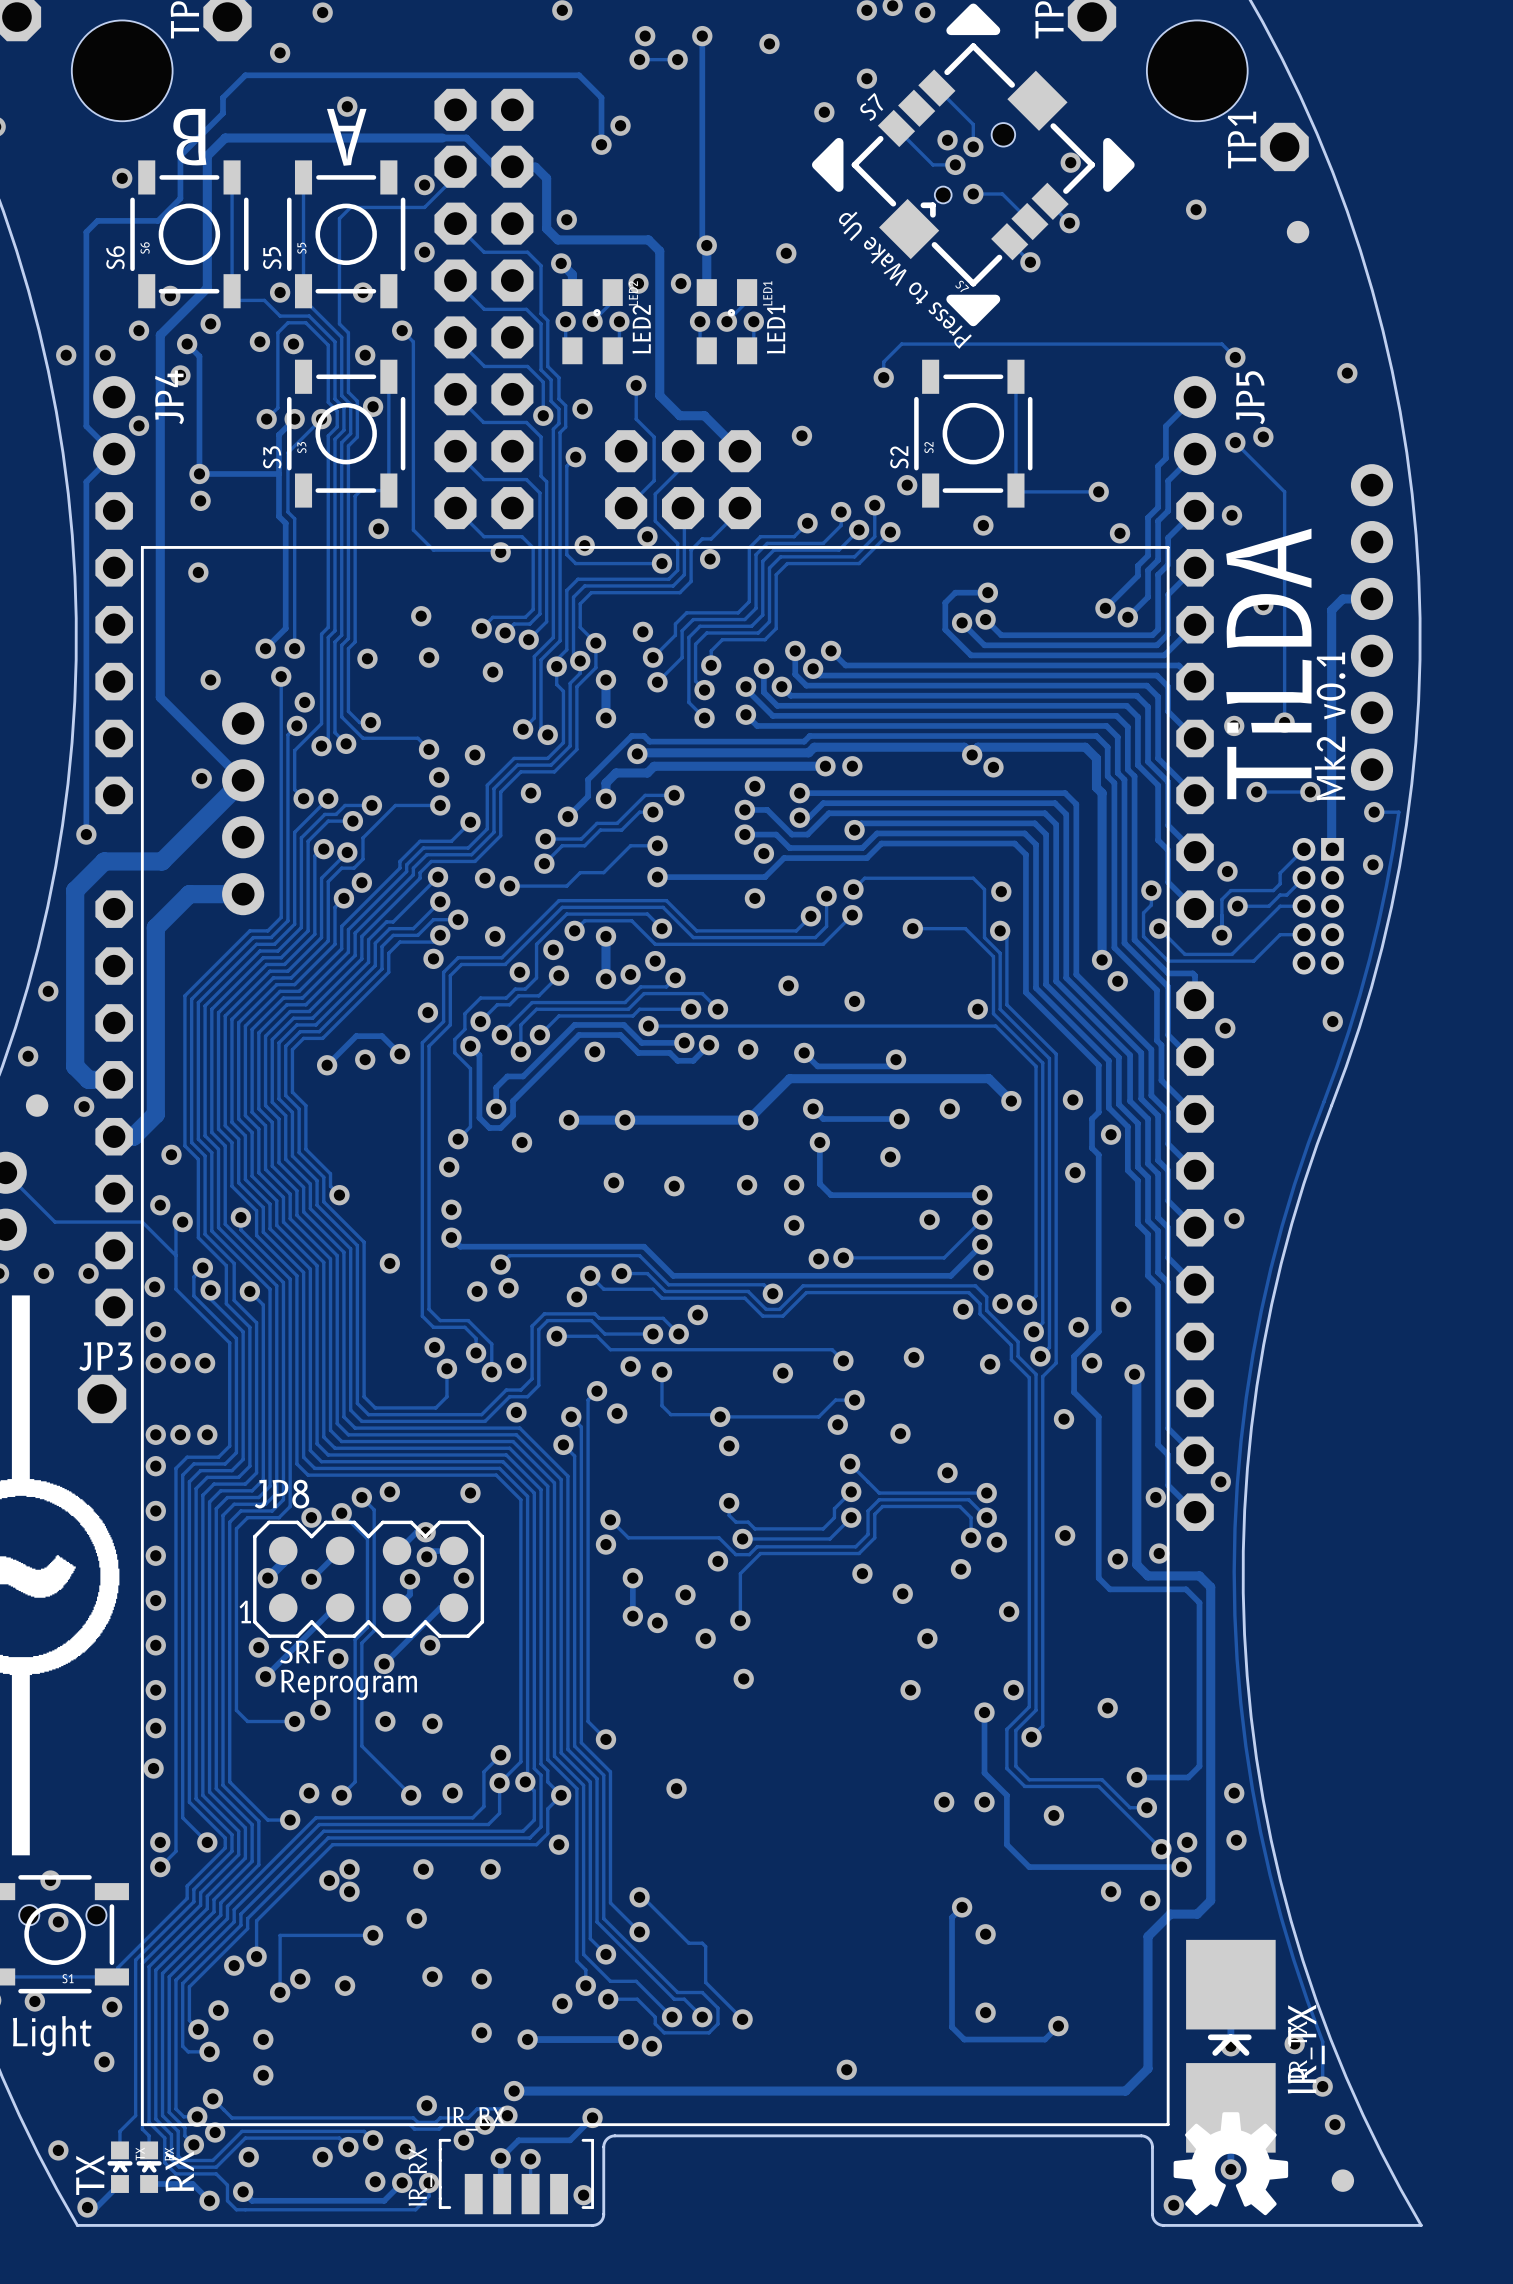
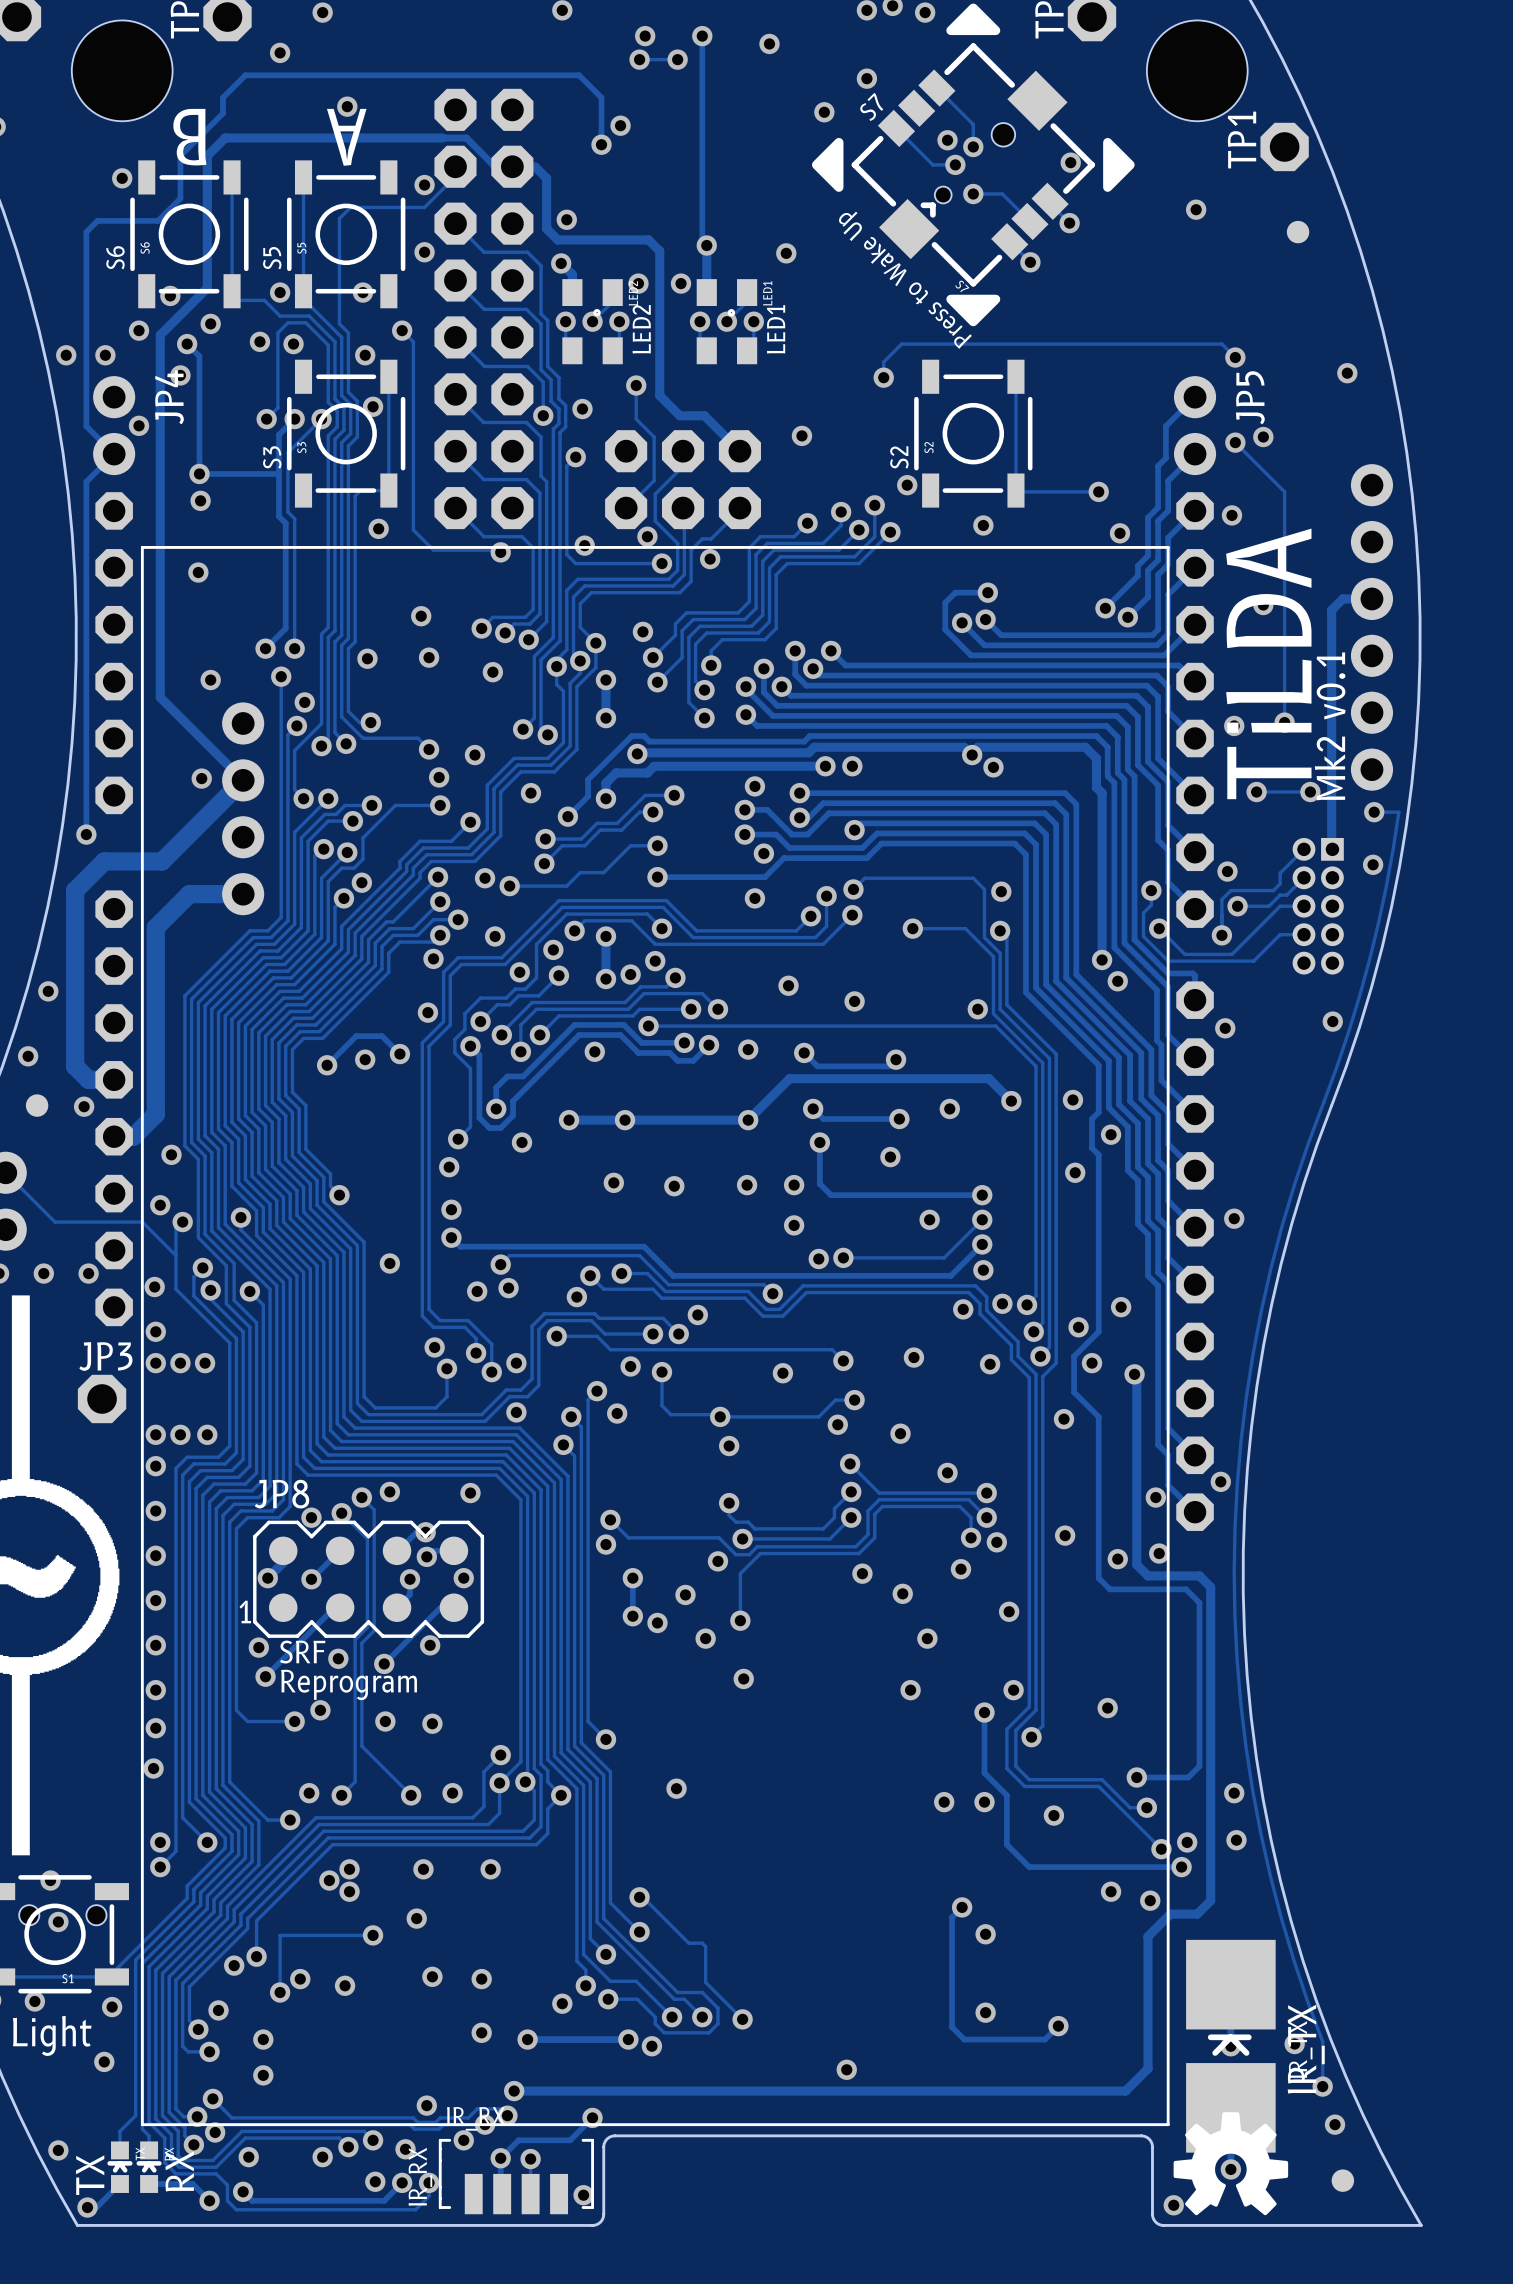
via: (558, 1844) -> none

